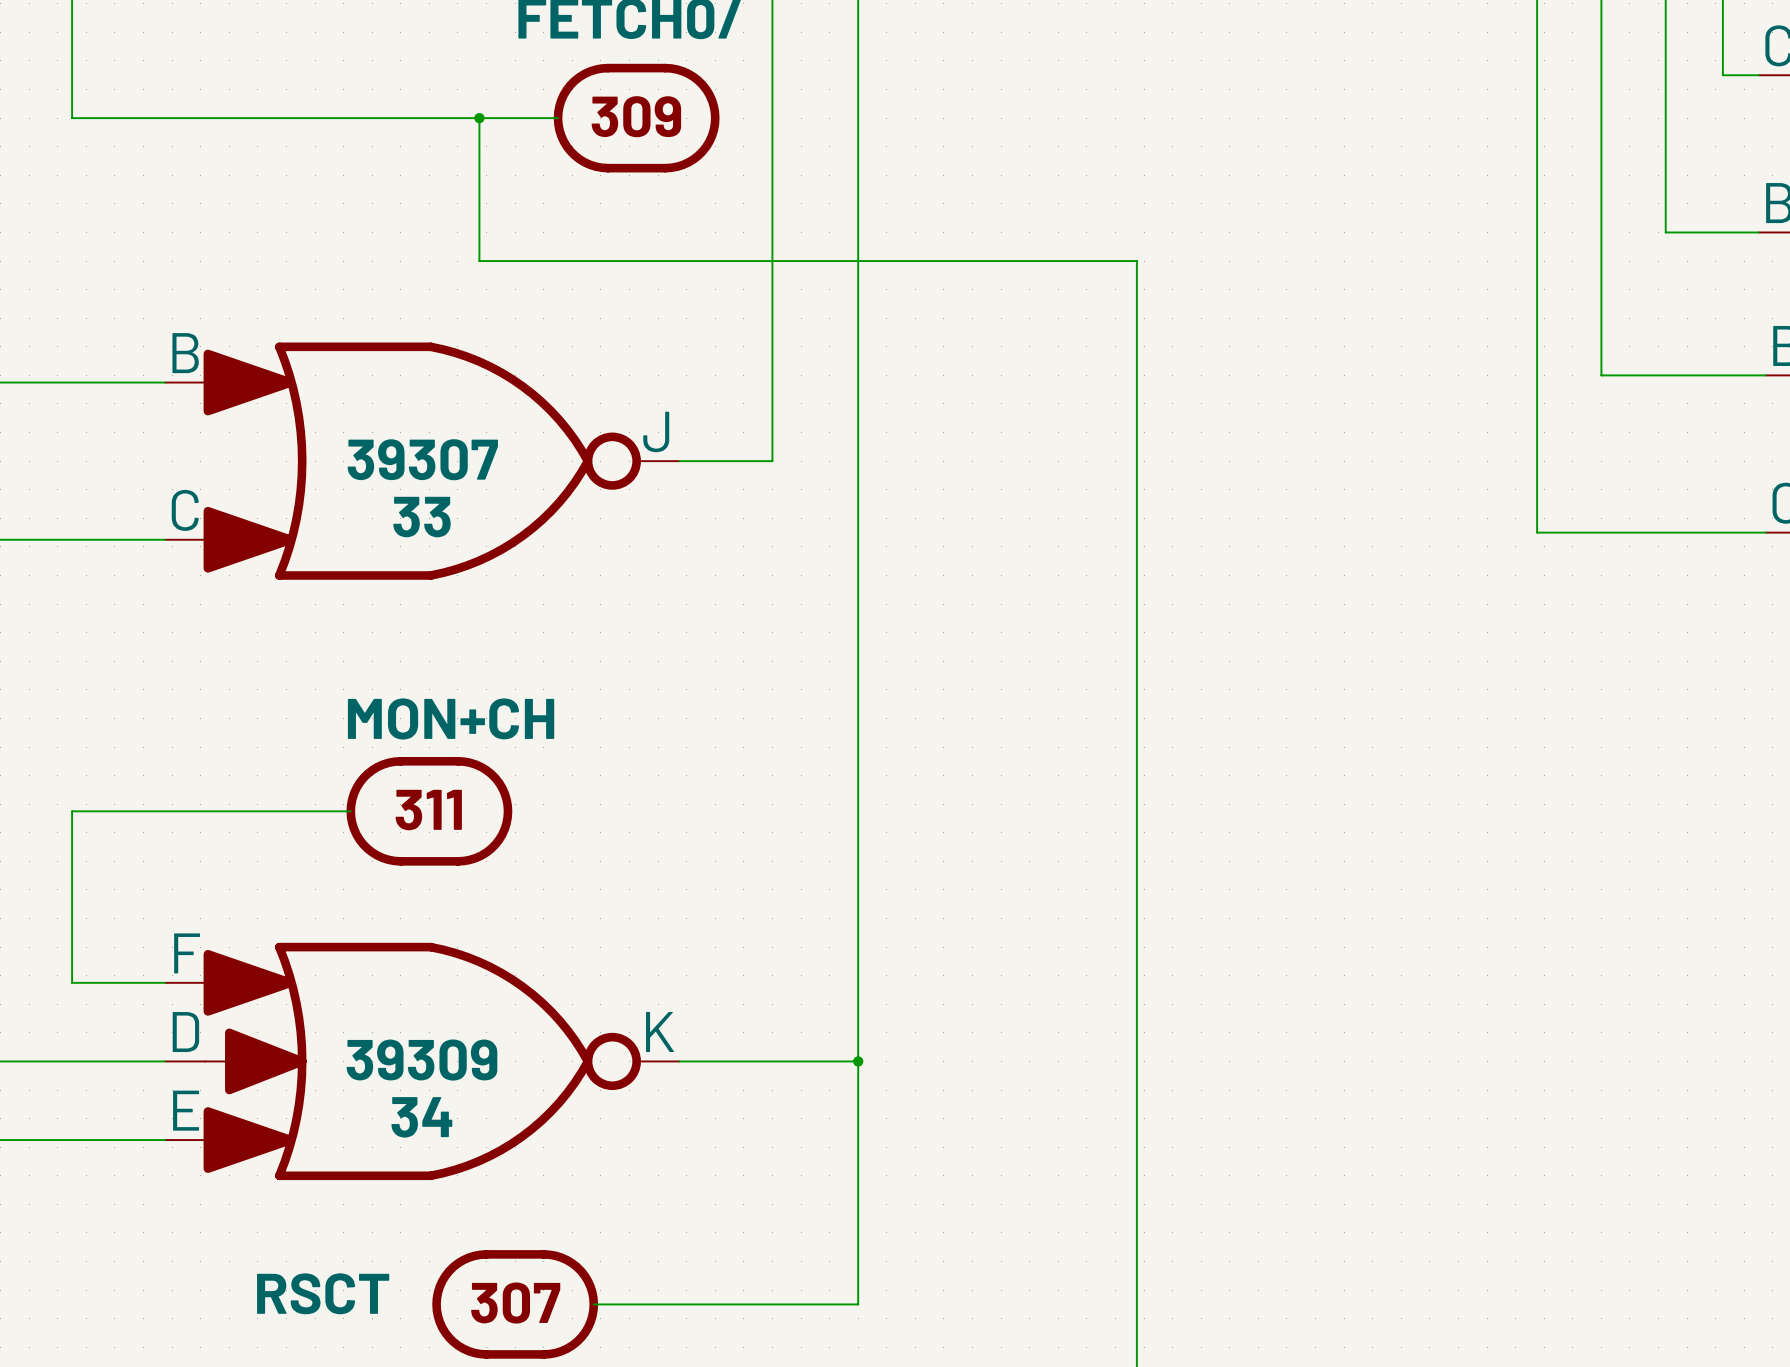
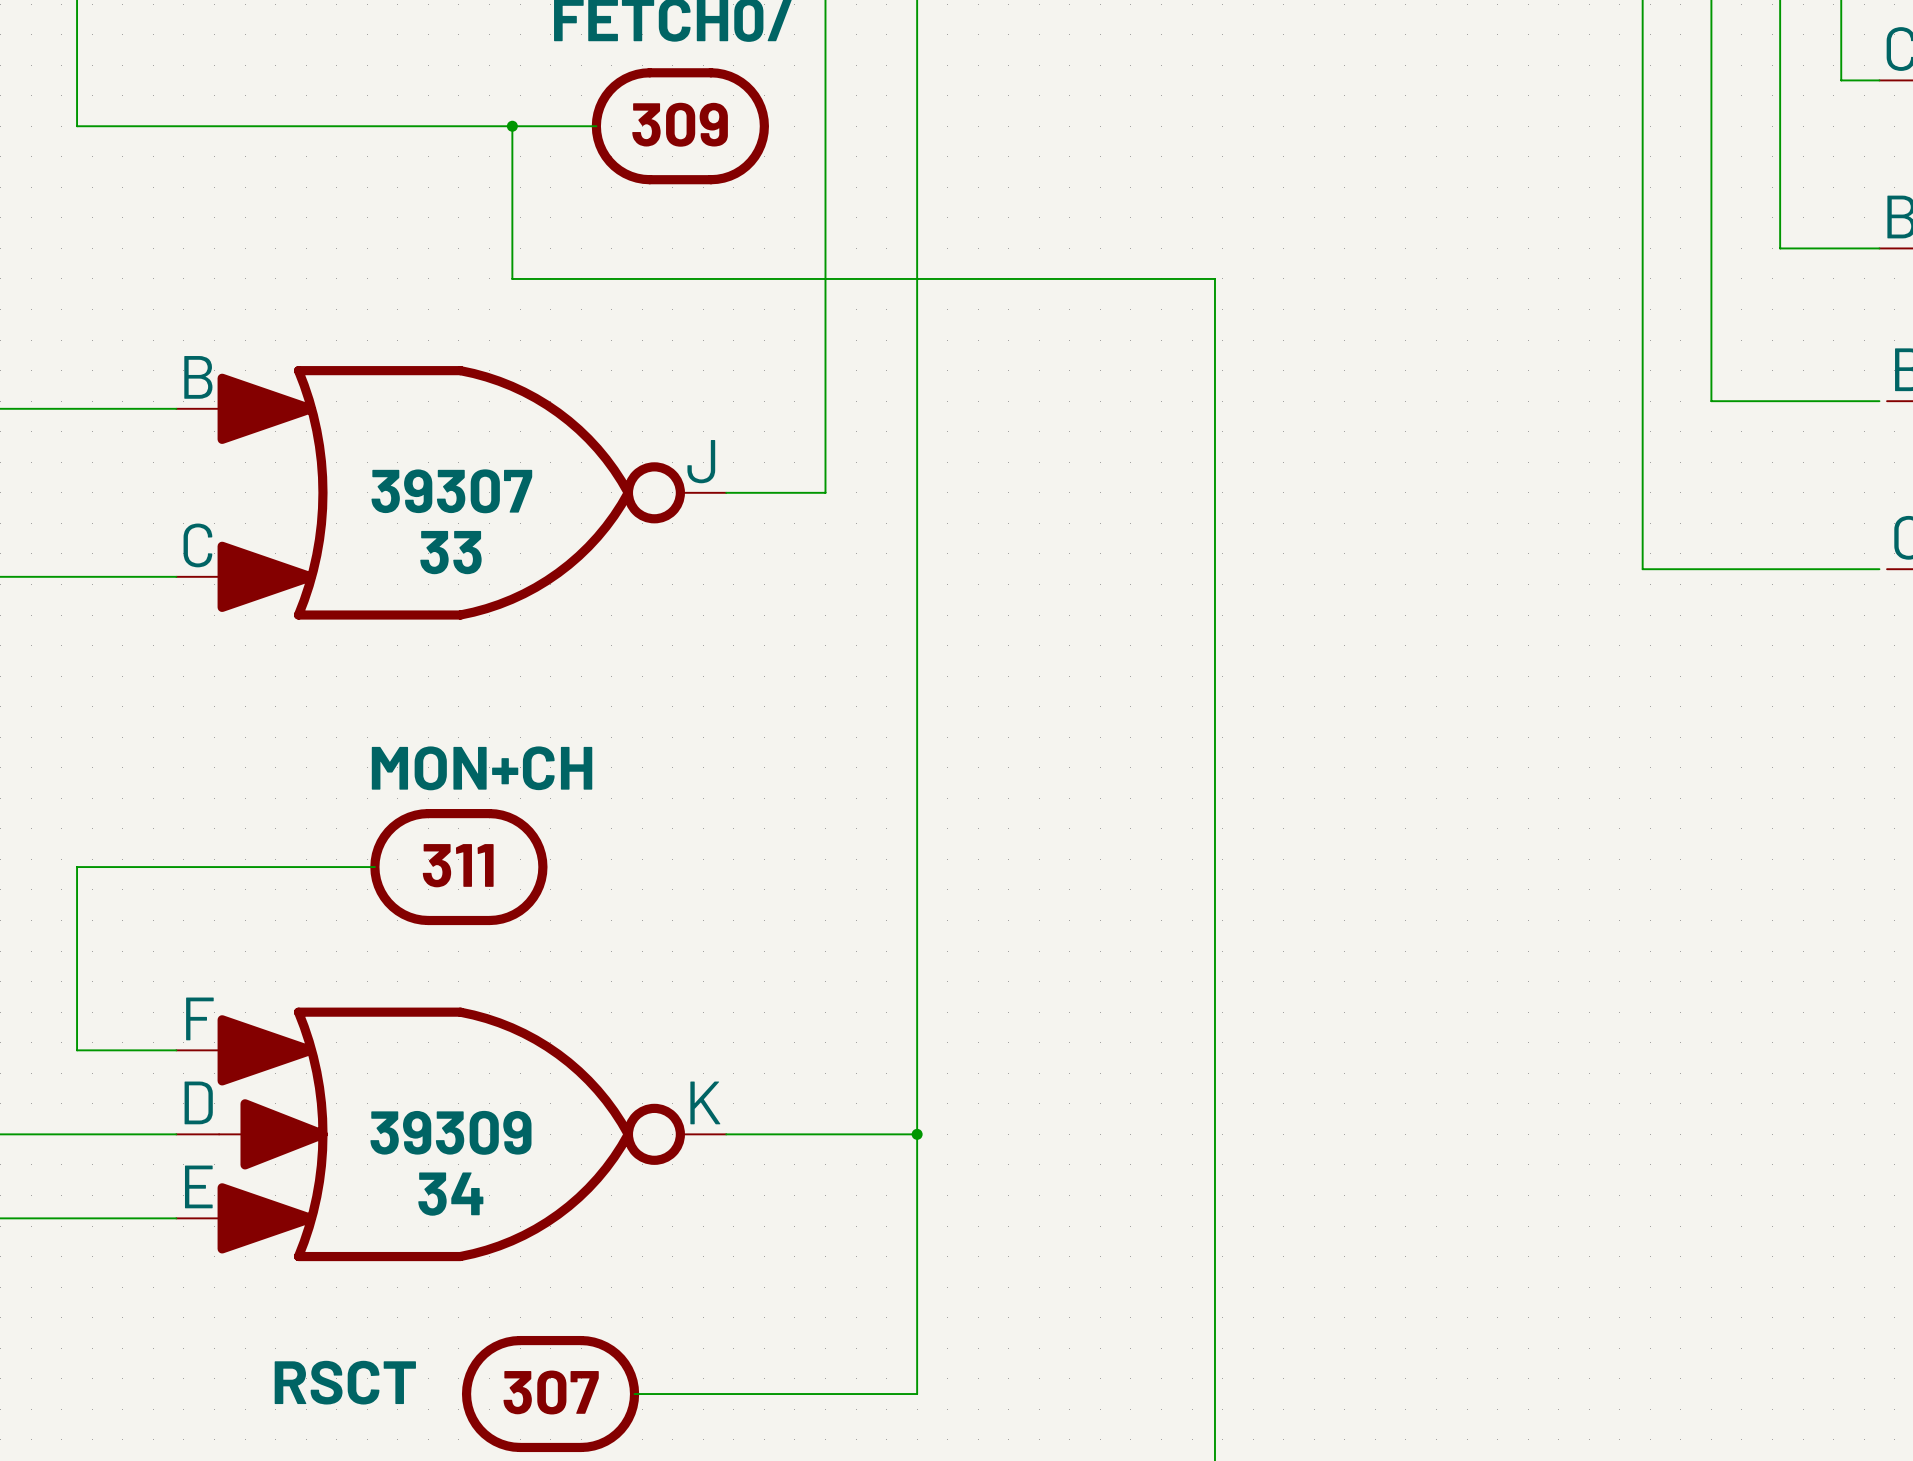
wire: (1758, 375) (1765, 375) -> none
wire: (1758, 532) (1765, 532) -> none

